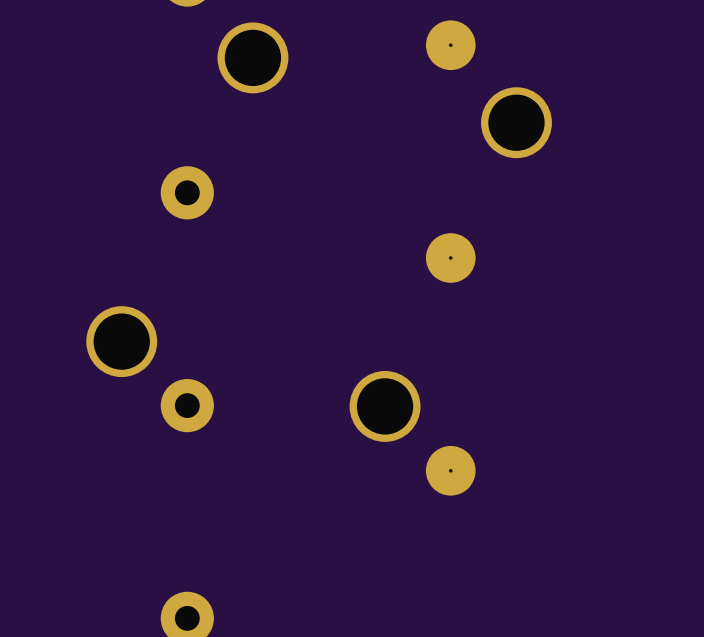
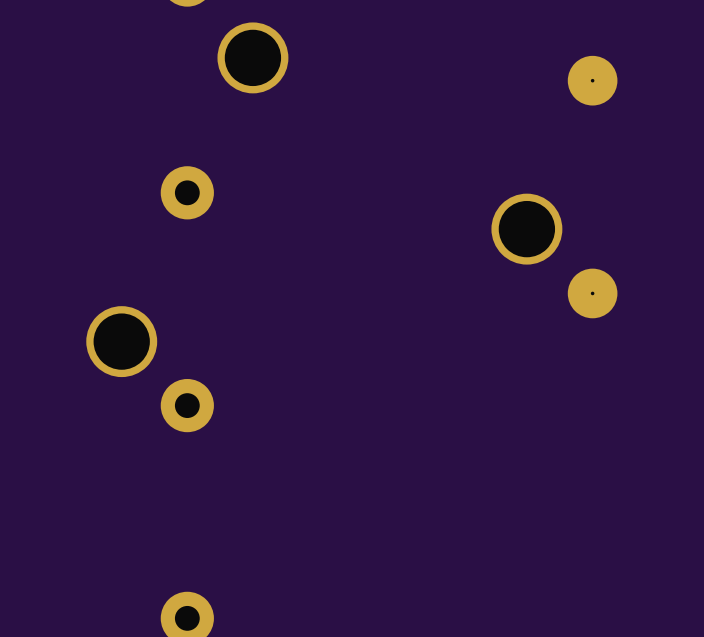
via: (450, 45) -> none
via: none -> (592, 80)
via position: (516, 122) -> (526, 229)
via: (450, 258) -> none
via: none -> (592, 293)
via: (385, 406) -> none
via: (450, 470) -> none

